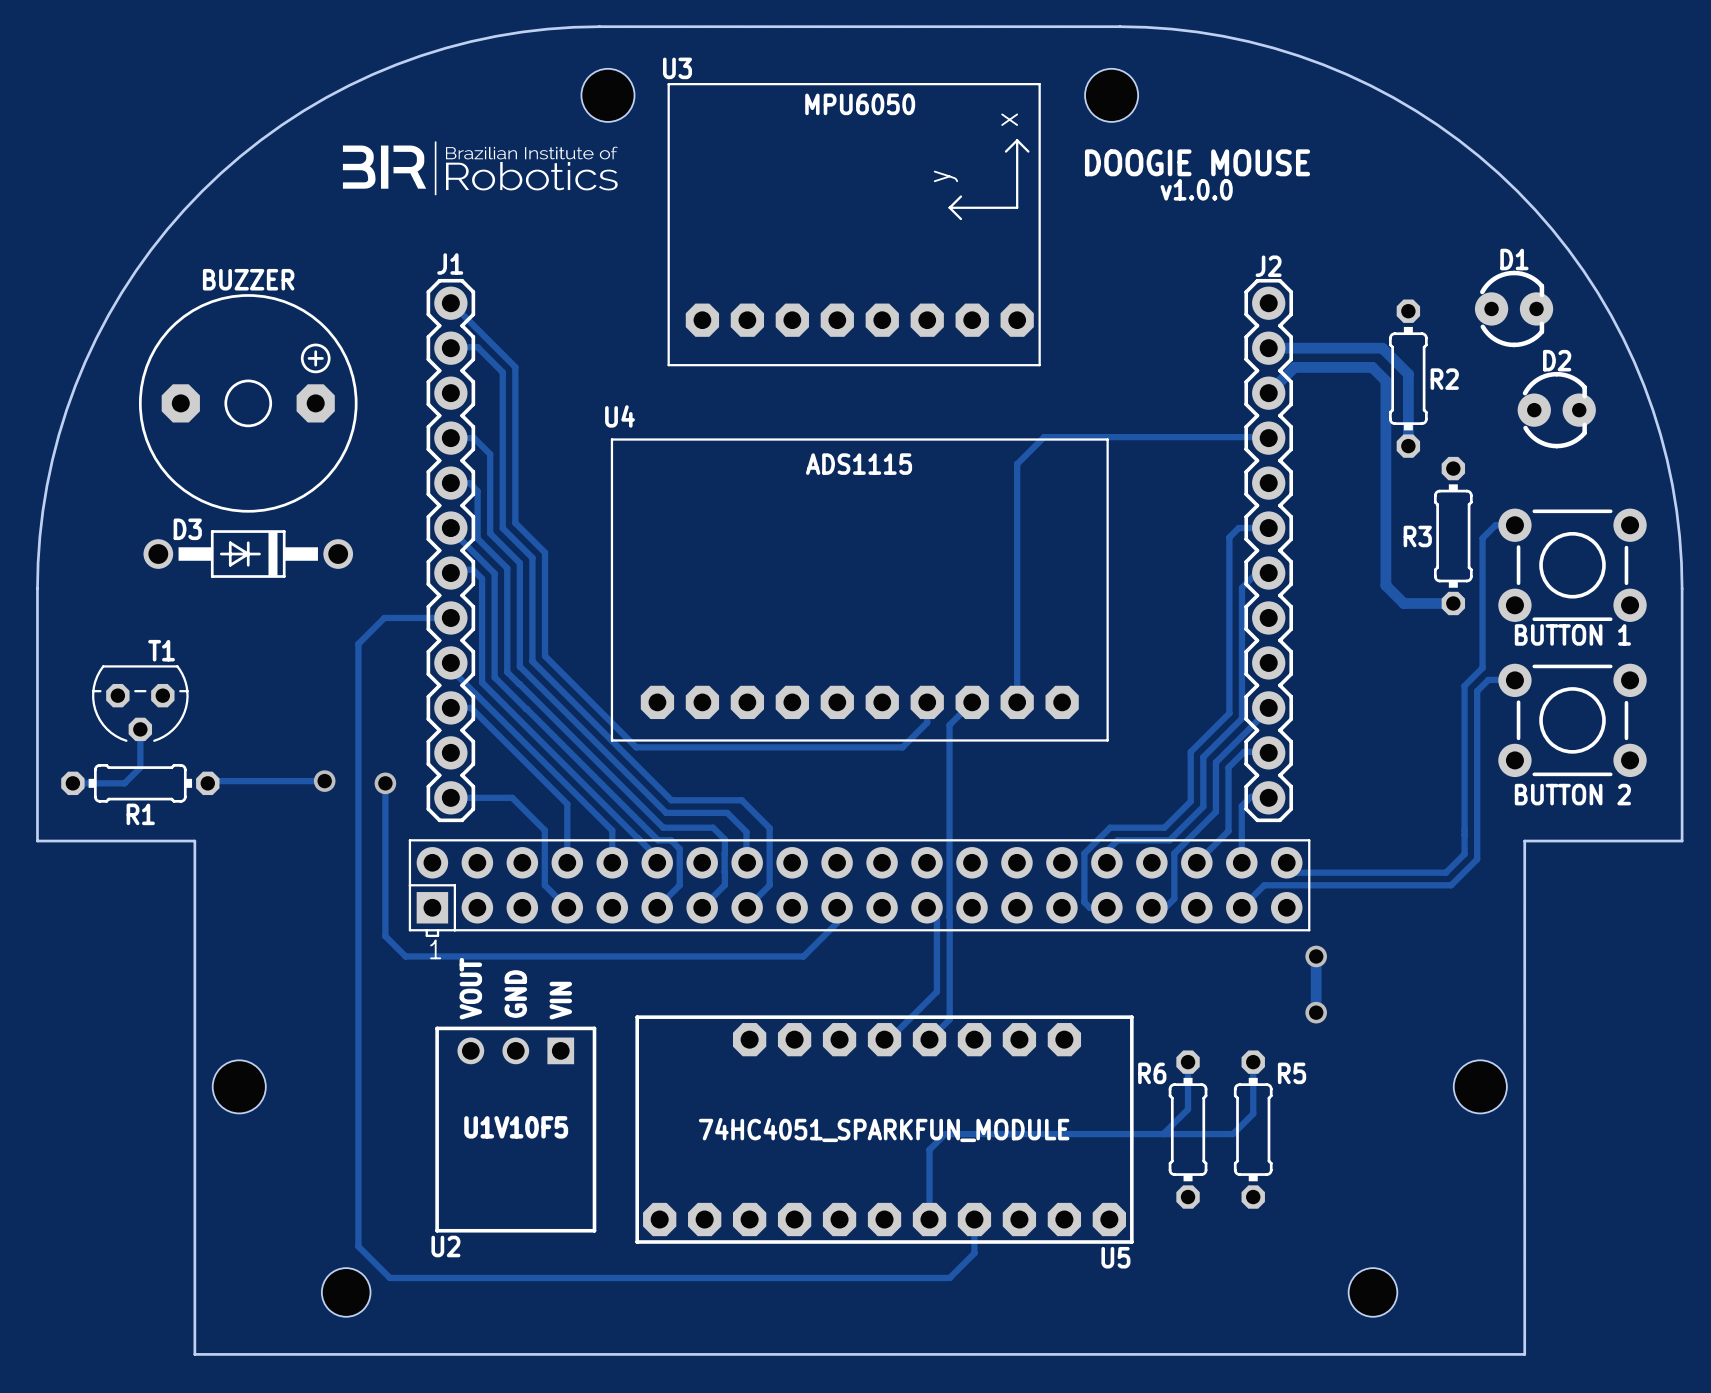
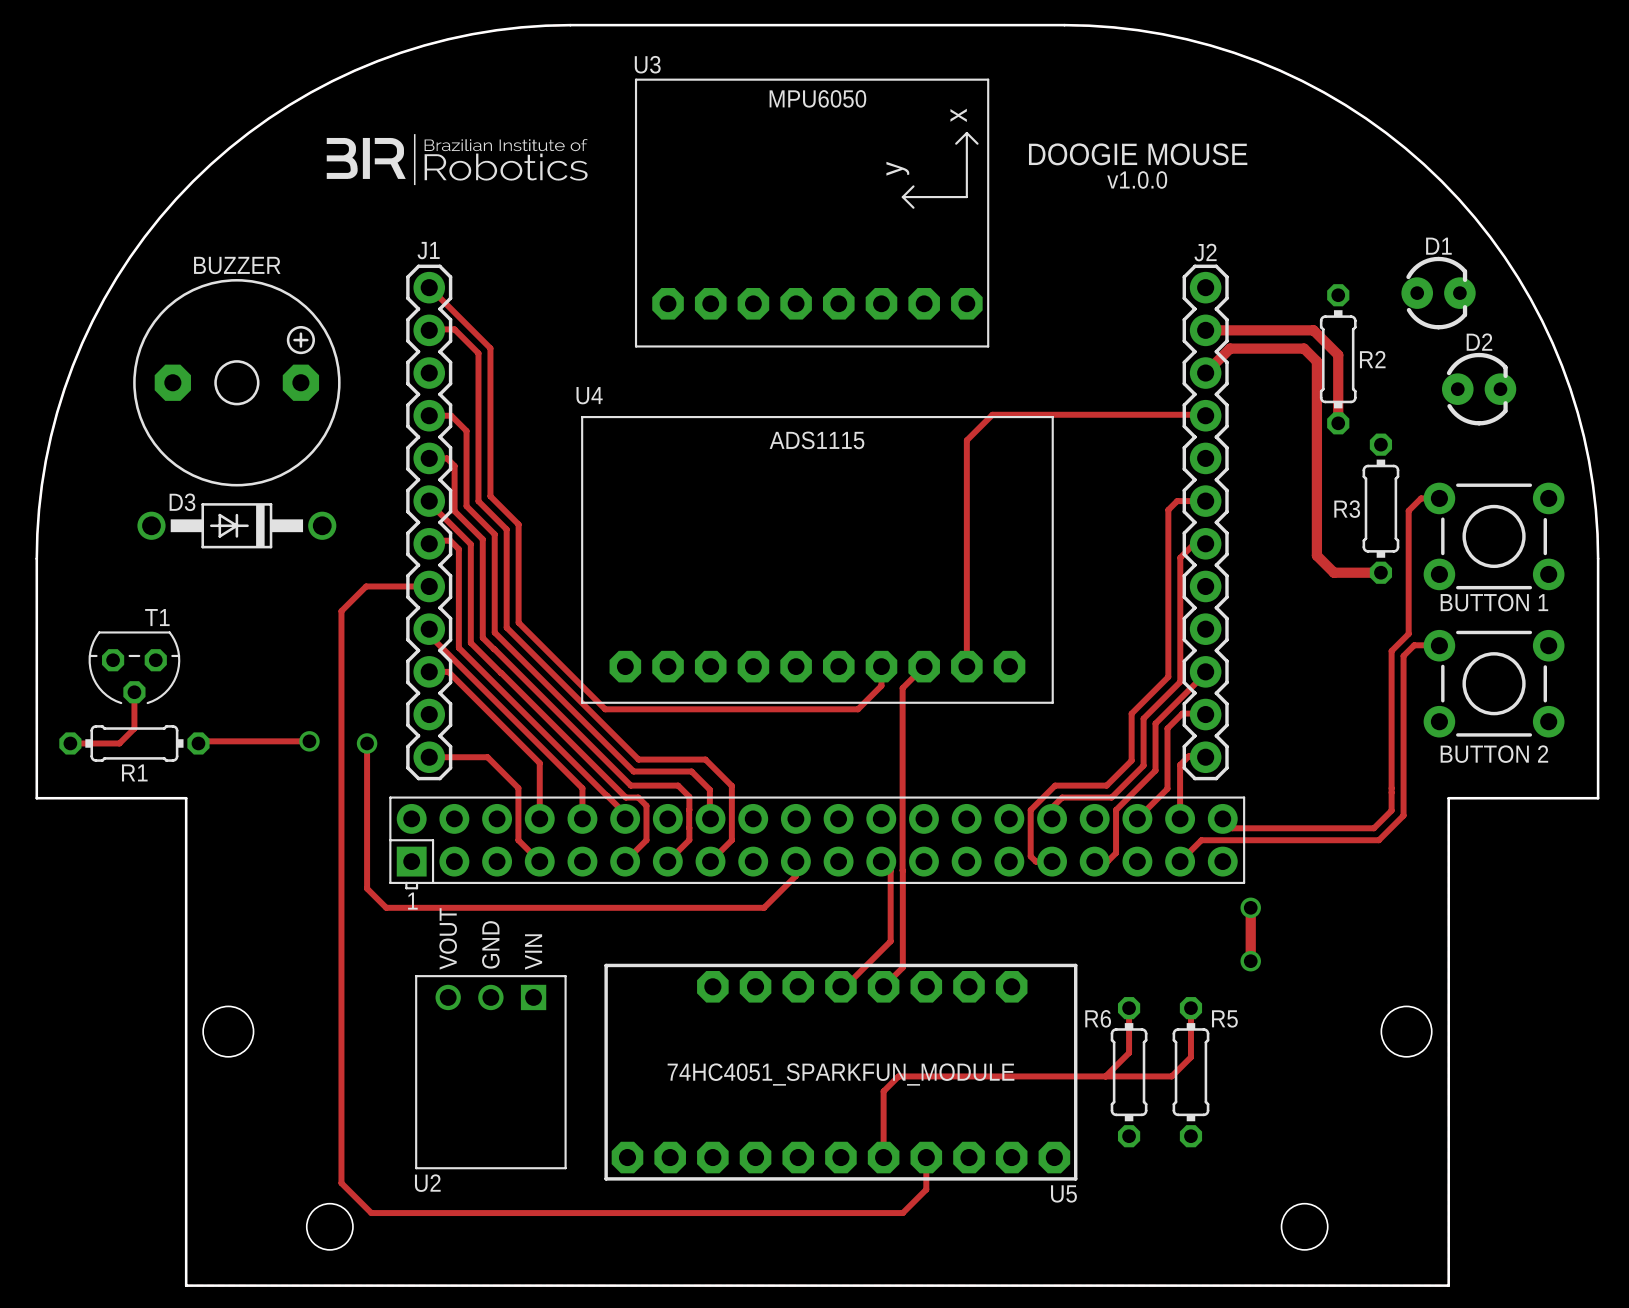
hole: (607, 95) -> none
hole: (1111, 95) -> none
U2 footprint: [435, 1026, 597, 1233] -> [415, 975, 567, 1170]

